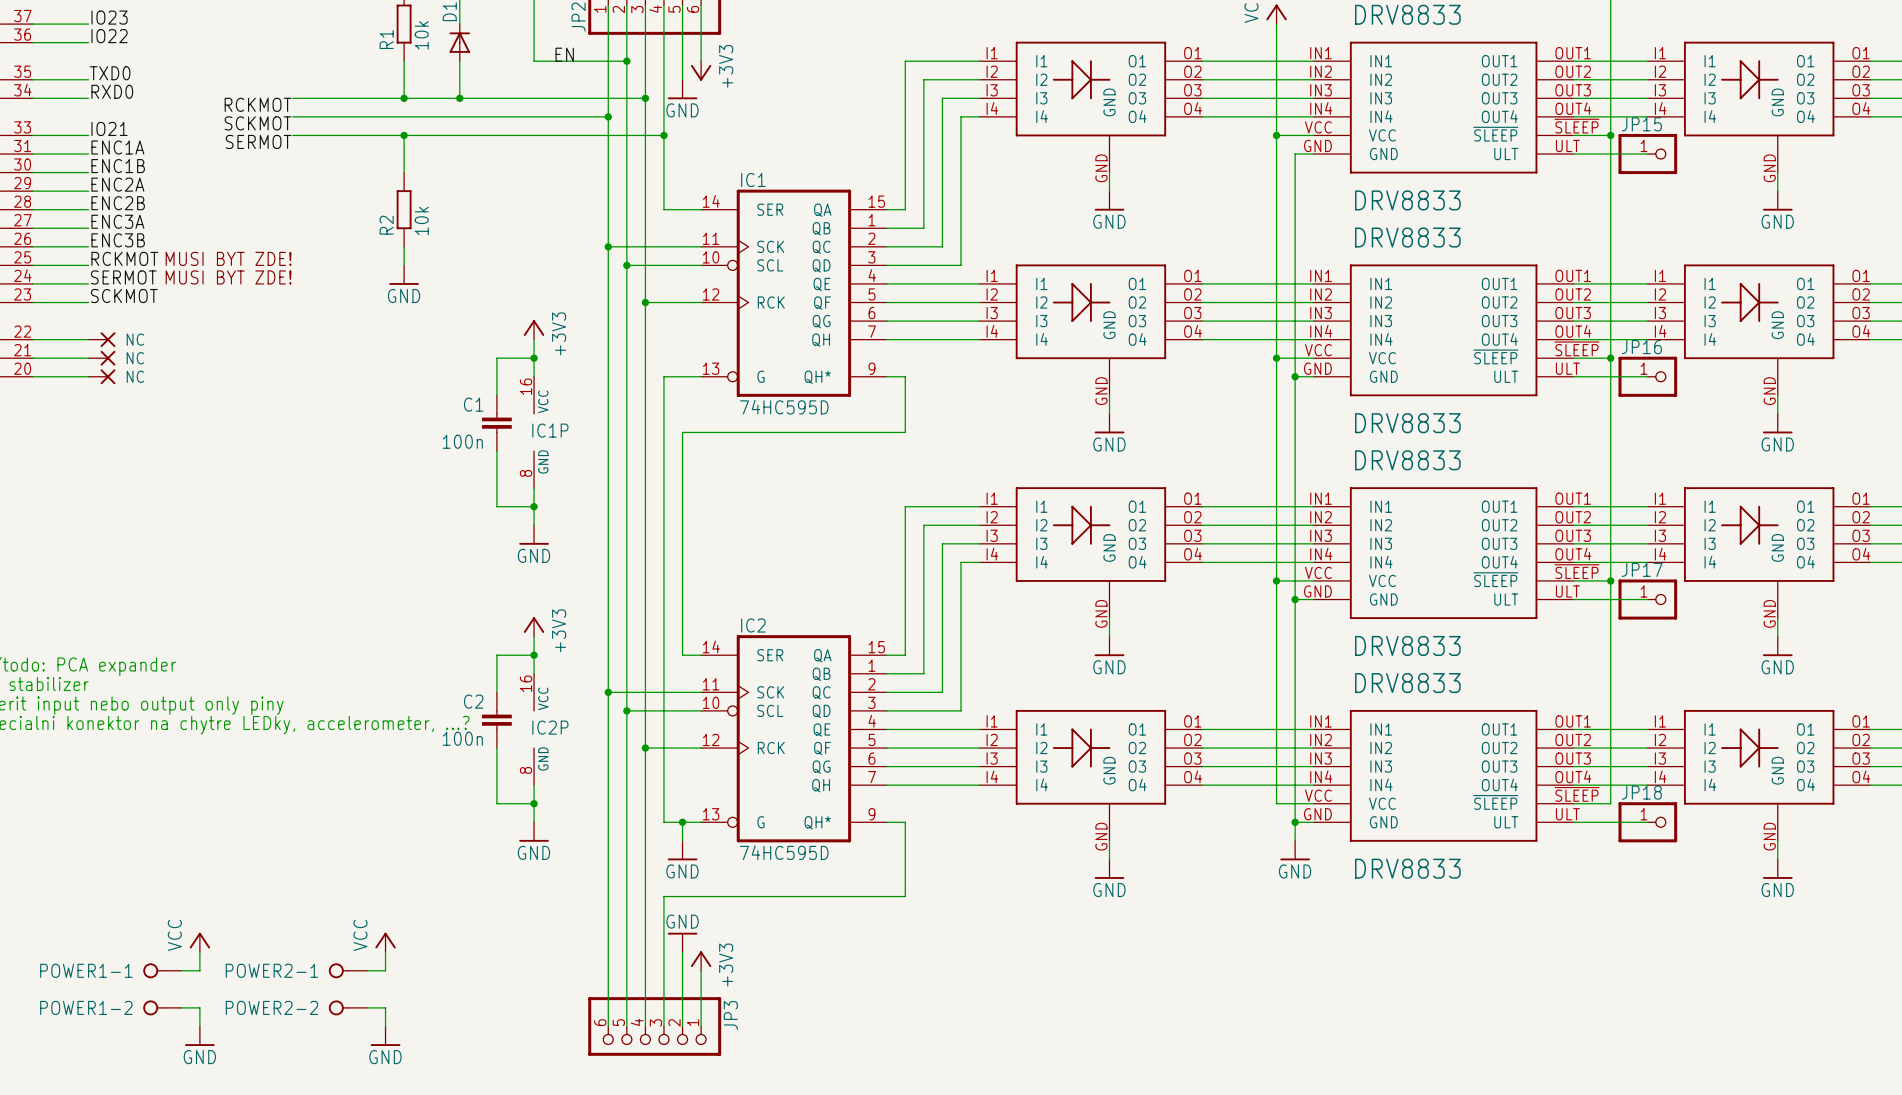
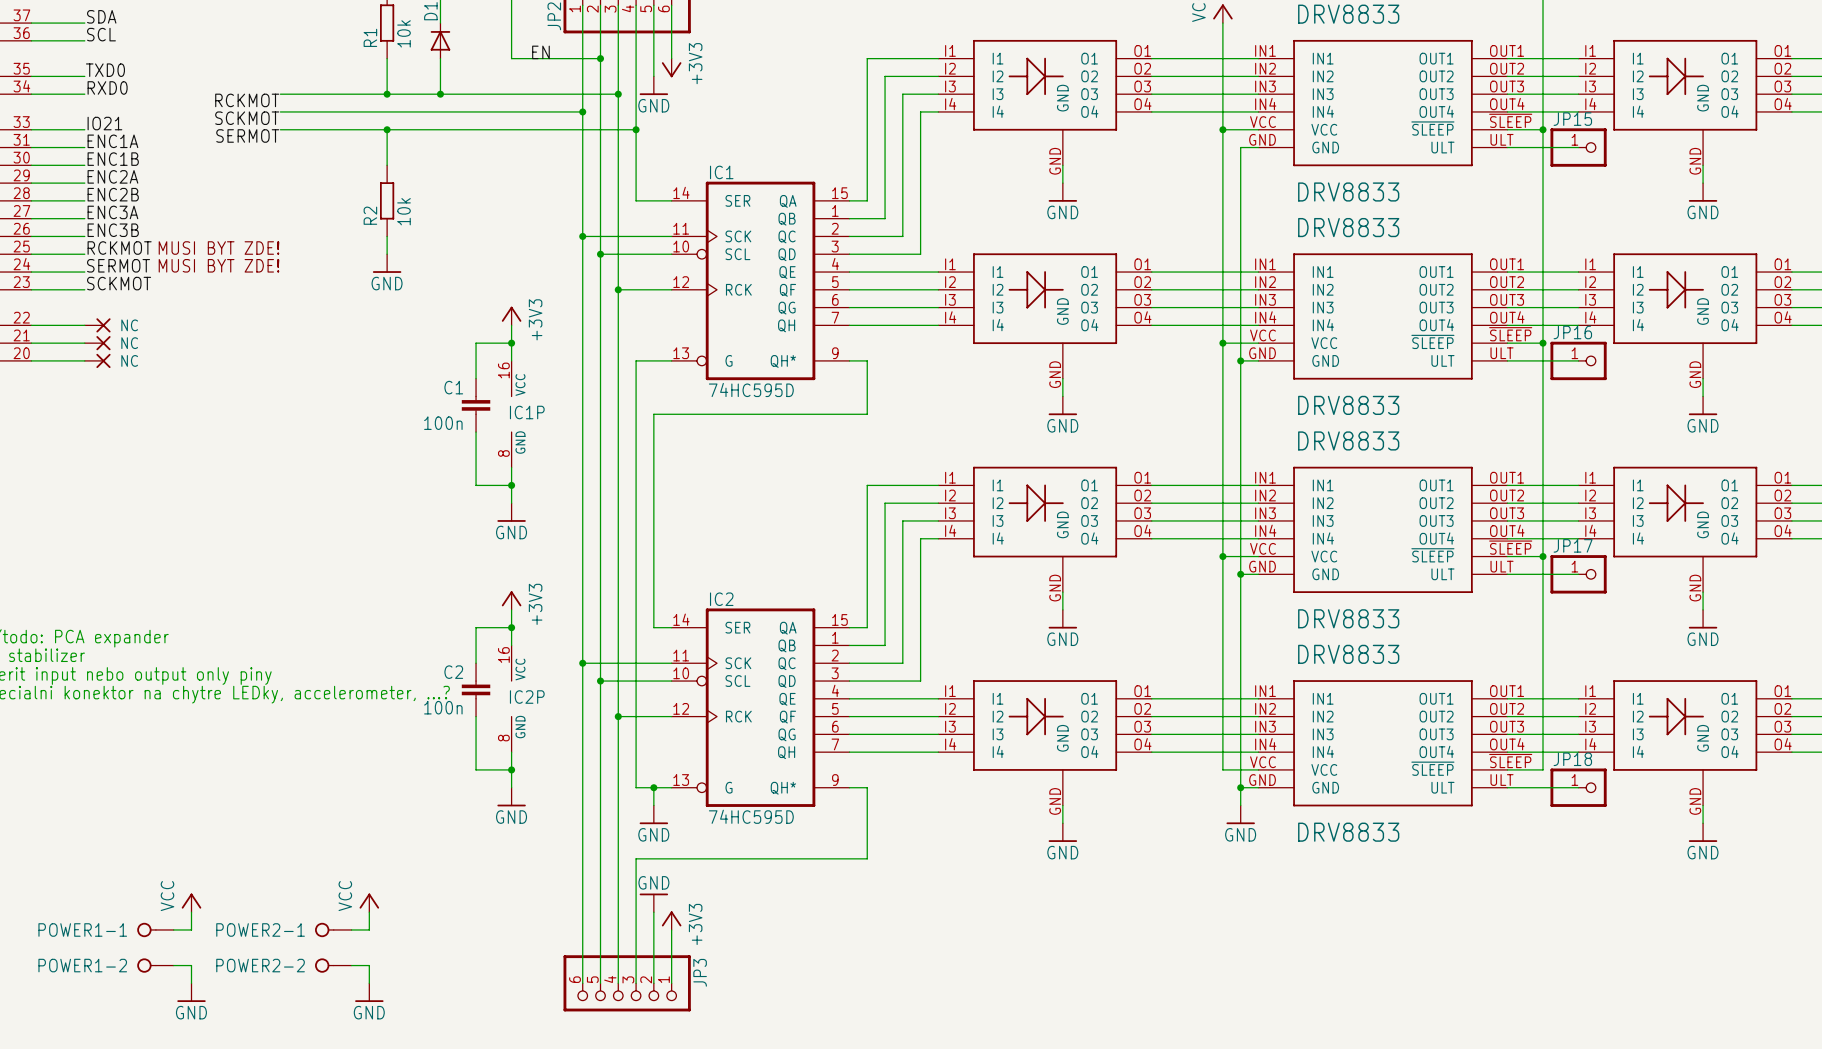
label: IO23 (109, 17) -> SDA (101, 16)
label: IO22 (109, 36) -> SCL (101, 34)

